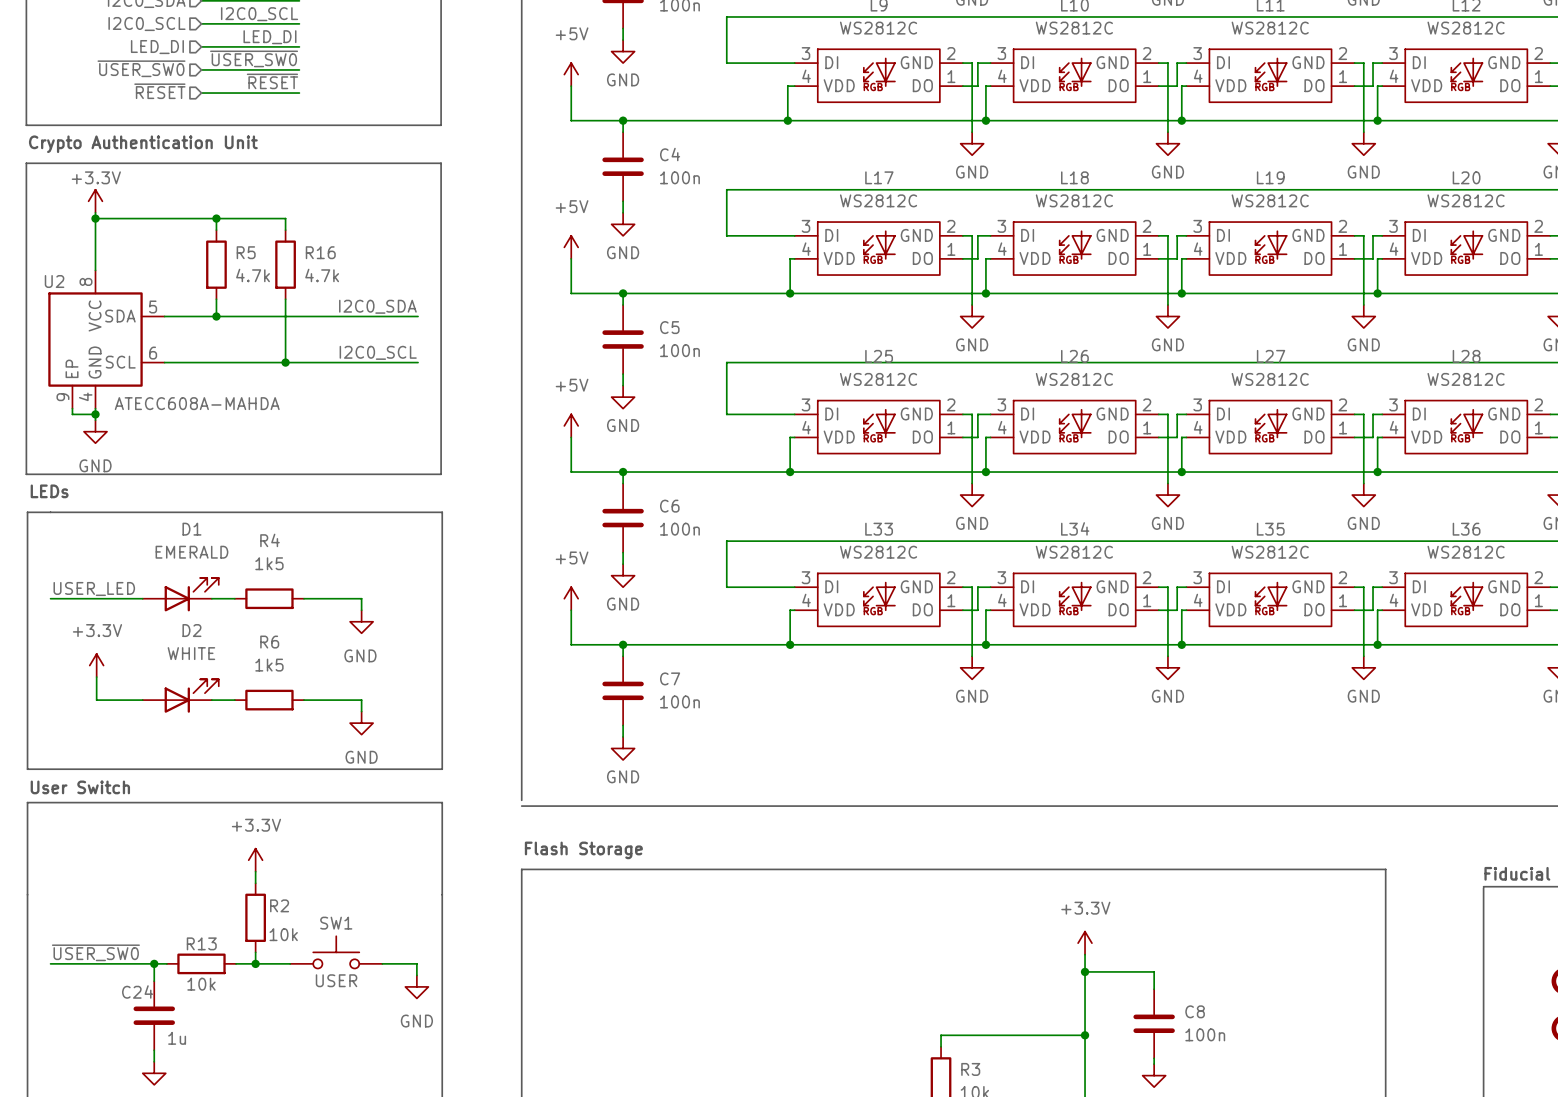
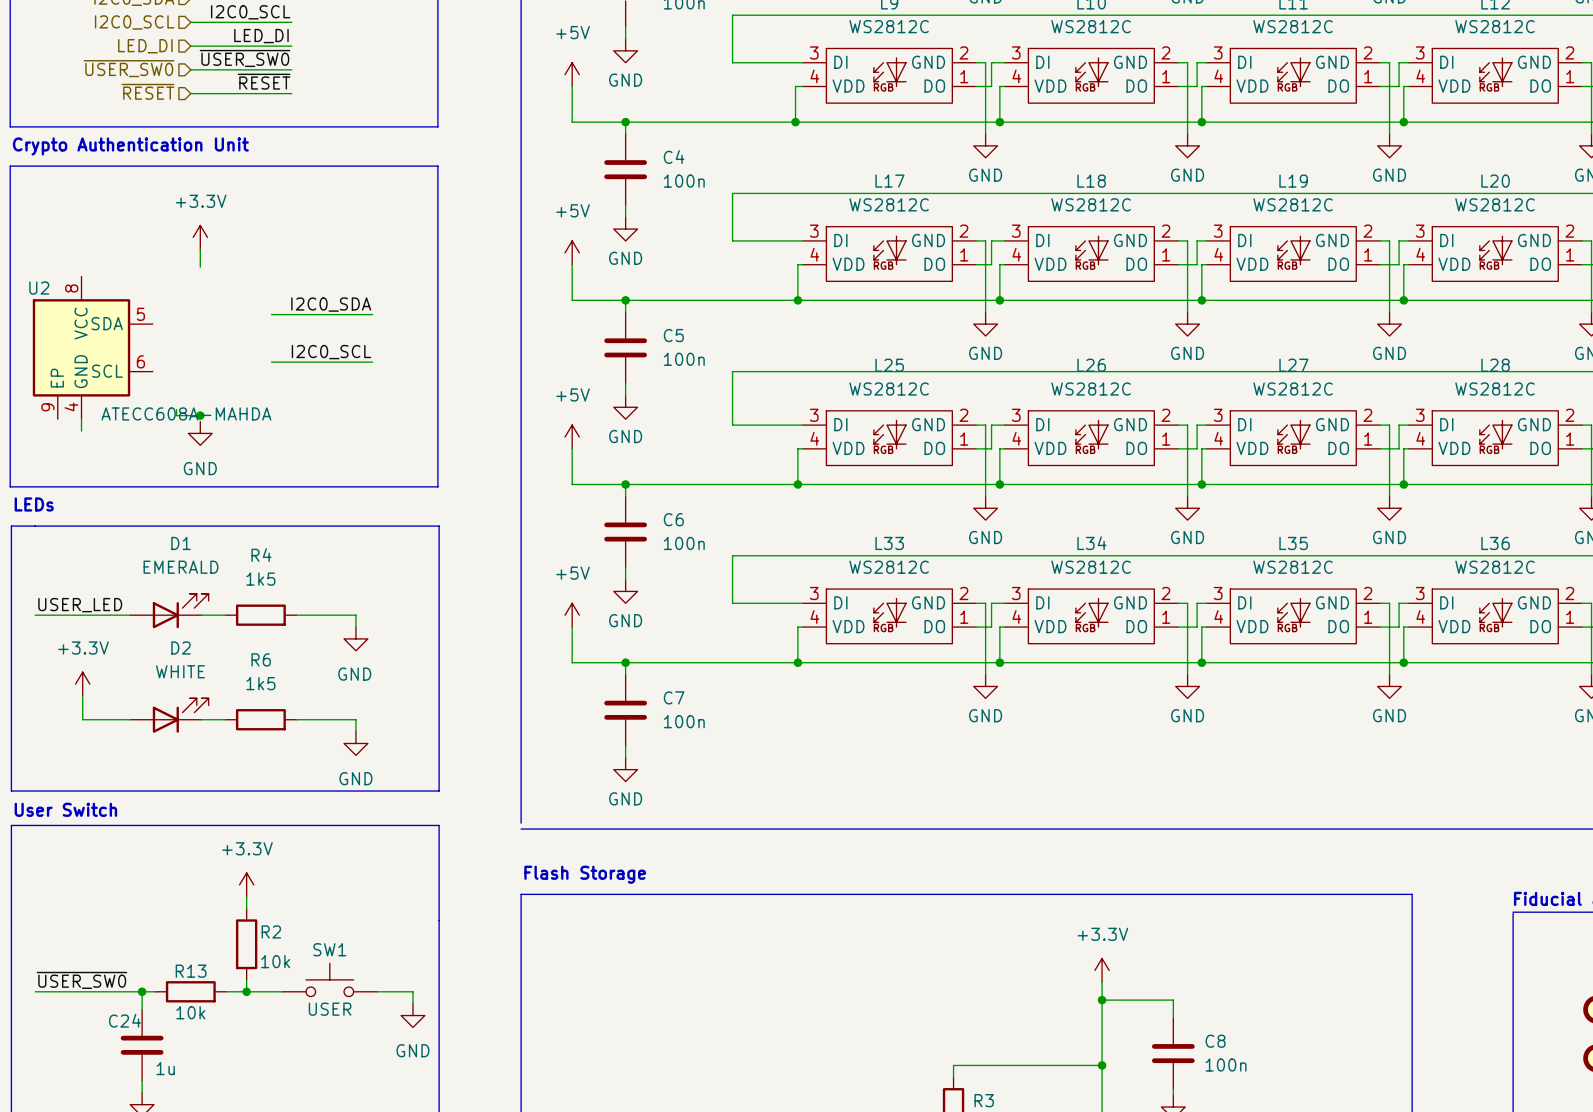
power symbol text position: +3.3V (96, 177) -> +3.3V (201, 201)
power symbol position: +3.3V (95, 201) -> +3.3V (200, 237)
wire: (95, 212) (95, 270) -> none
wire: (95, 218) (285, 218) (285, 230) -> none
junction: (95, 218) -> none
wire: (216, 218) (216, 230) -> none
junction: (216, 218) -> none
R5: 4.7k (216, 264) -> none
R16: 4.7k (285, 264) -> none
wire: (216, 299) (216, 316) -> (200, 249) (200, 267)
wire: (285, 299) (285, 362) -> none
label position: I2C0_SDA (377, 306) -> I2C0_SDA (331, 304)
wire: none -> (271, 314) (372, 314)
wire: (164, 316) (418, 316) -> none
junction: (216, 316) -> none
label position: I2C0_SCL (378, 352) -> I2C0_SCL (331, 352)
wire: none -> (271, 362) (372, 362)
wire: (164, 362) (418, 362) -> none
junction: (285, 362) -> none
junction: none -> (200, 415)
wire: (72, 408) (72, 414) (95, 414) -> (176, 409) (176, 415) (200, 415)
junction: (95, 414) -> none
power symbol position: GND (95, 431) -> GND (200, 433)

